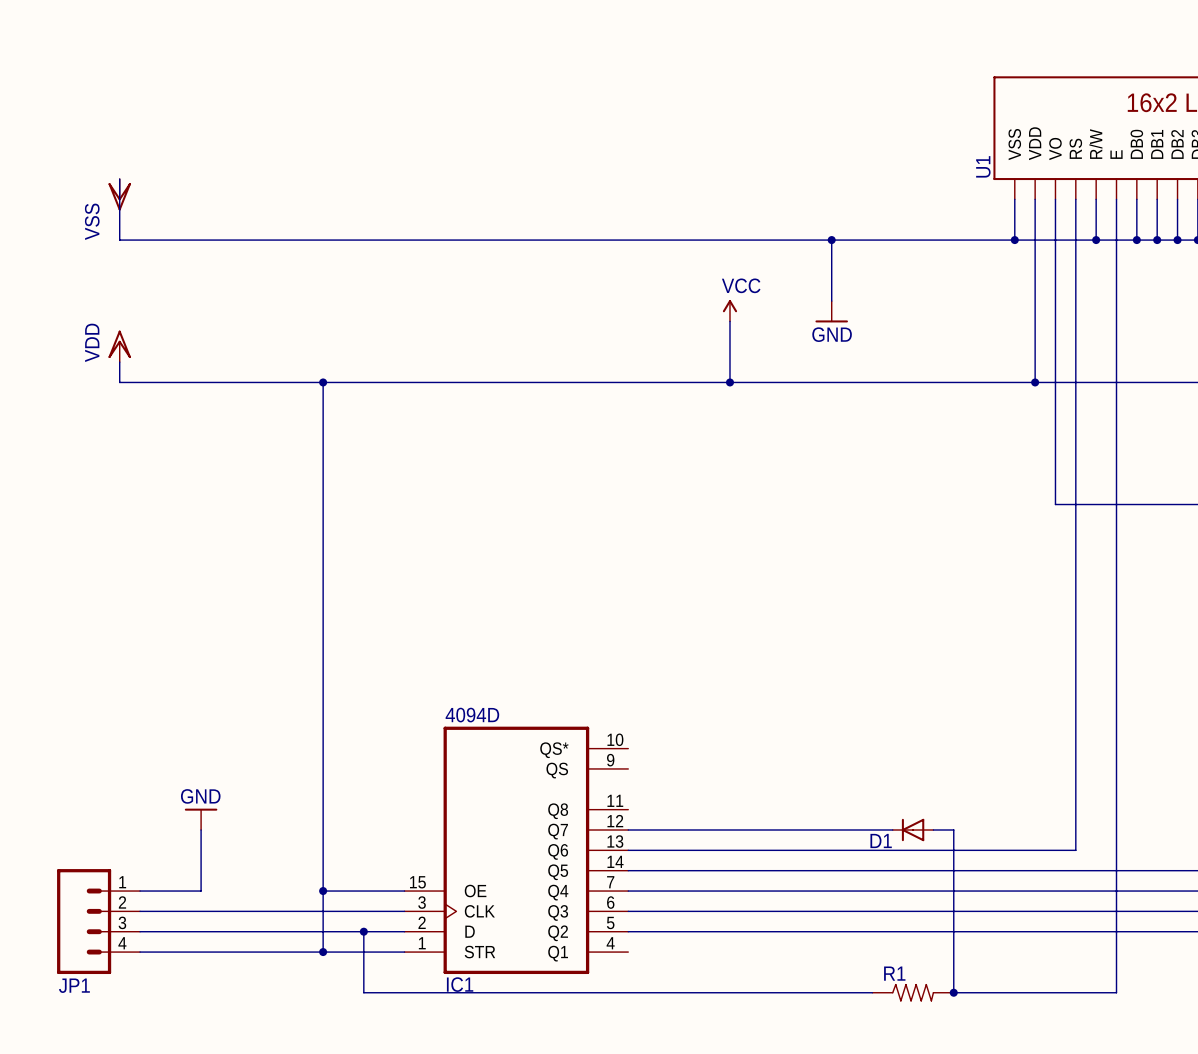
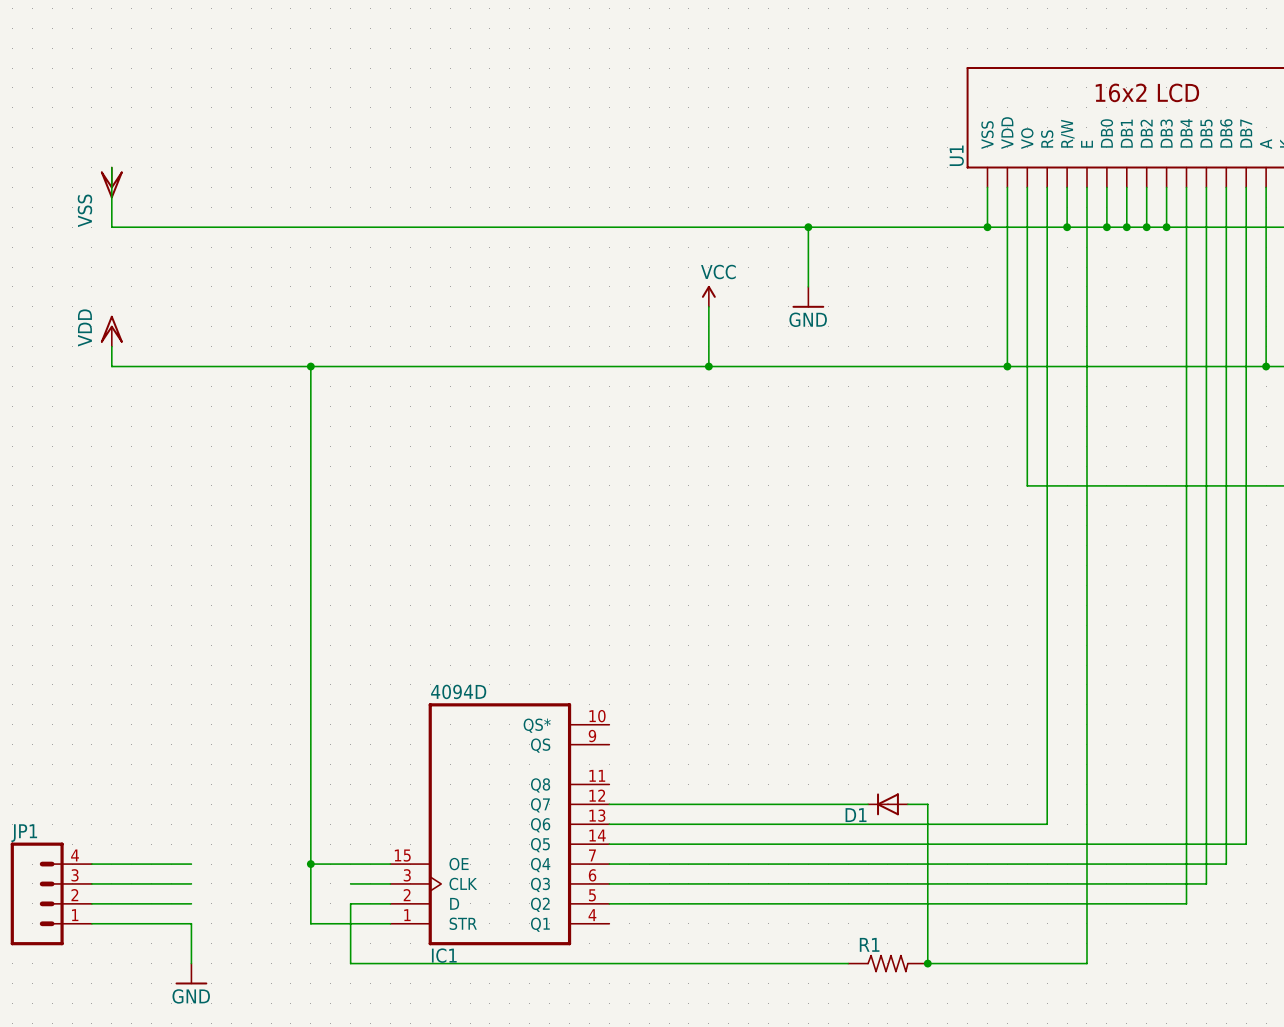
power symbol rotation: 0° (201, 809) -> 180° (191, 983)
power symbol position: GND (201, 819) -> GND (191, 974)
wire: (201, 830) (201, 891) -> none
wire: (201, 911) (363, 911) -> none
JP1 flip: as is (84, 921) -> up-down (37, 893)
wire: (201, 931) (363, 931) -> none
junction: (363, 931) -> none
wire: (201, 952) (323, 952) -> (191, 923) (191, 963)
junction: (323, 952) -> none

